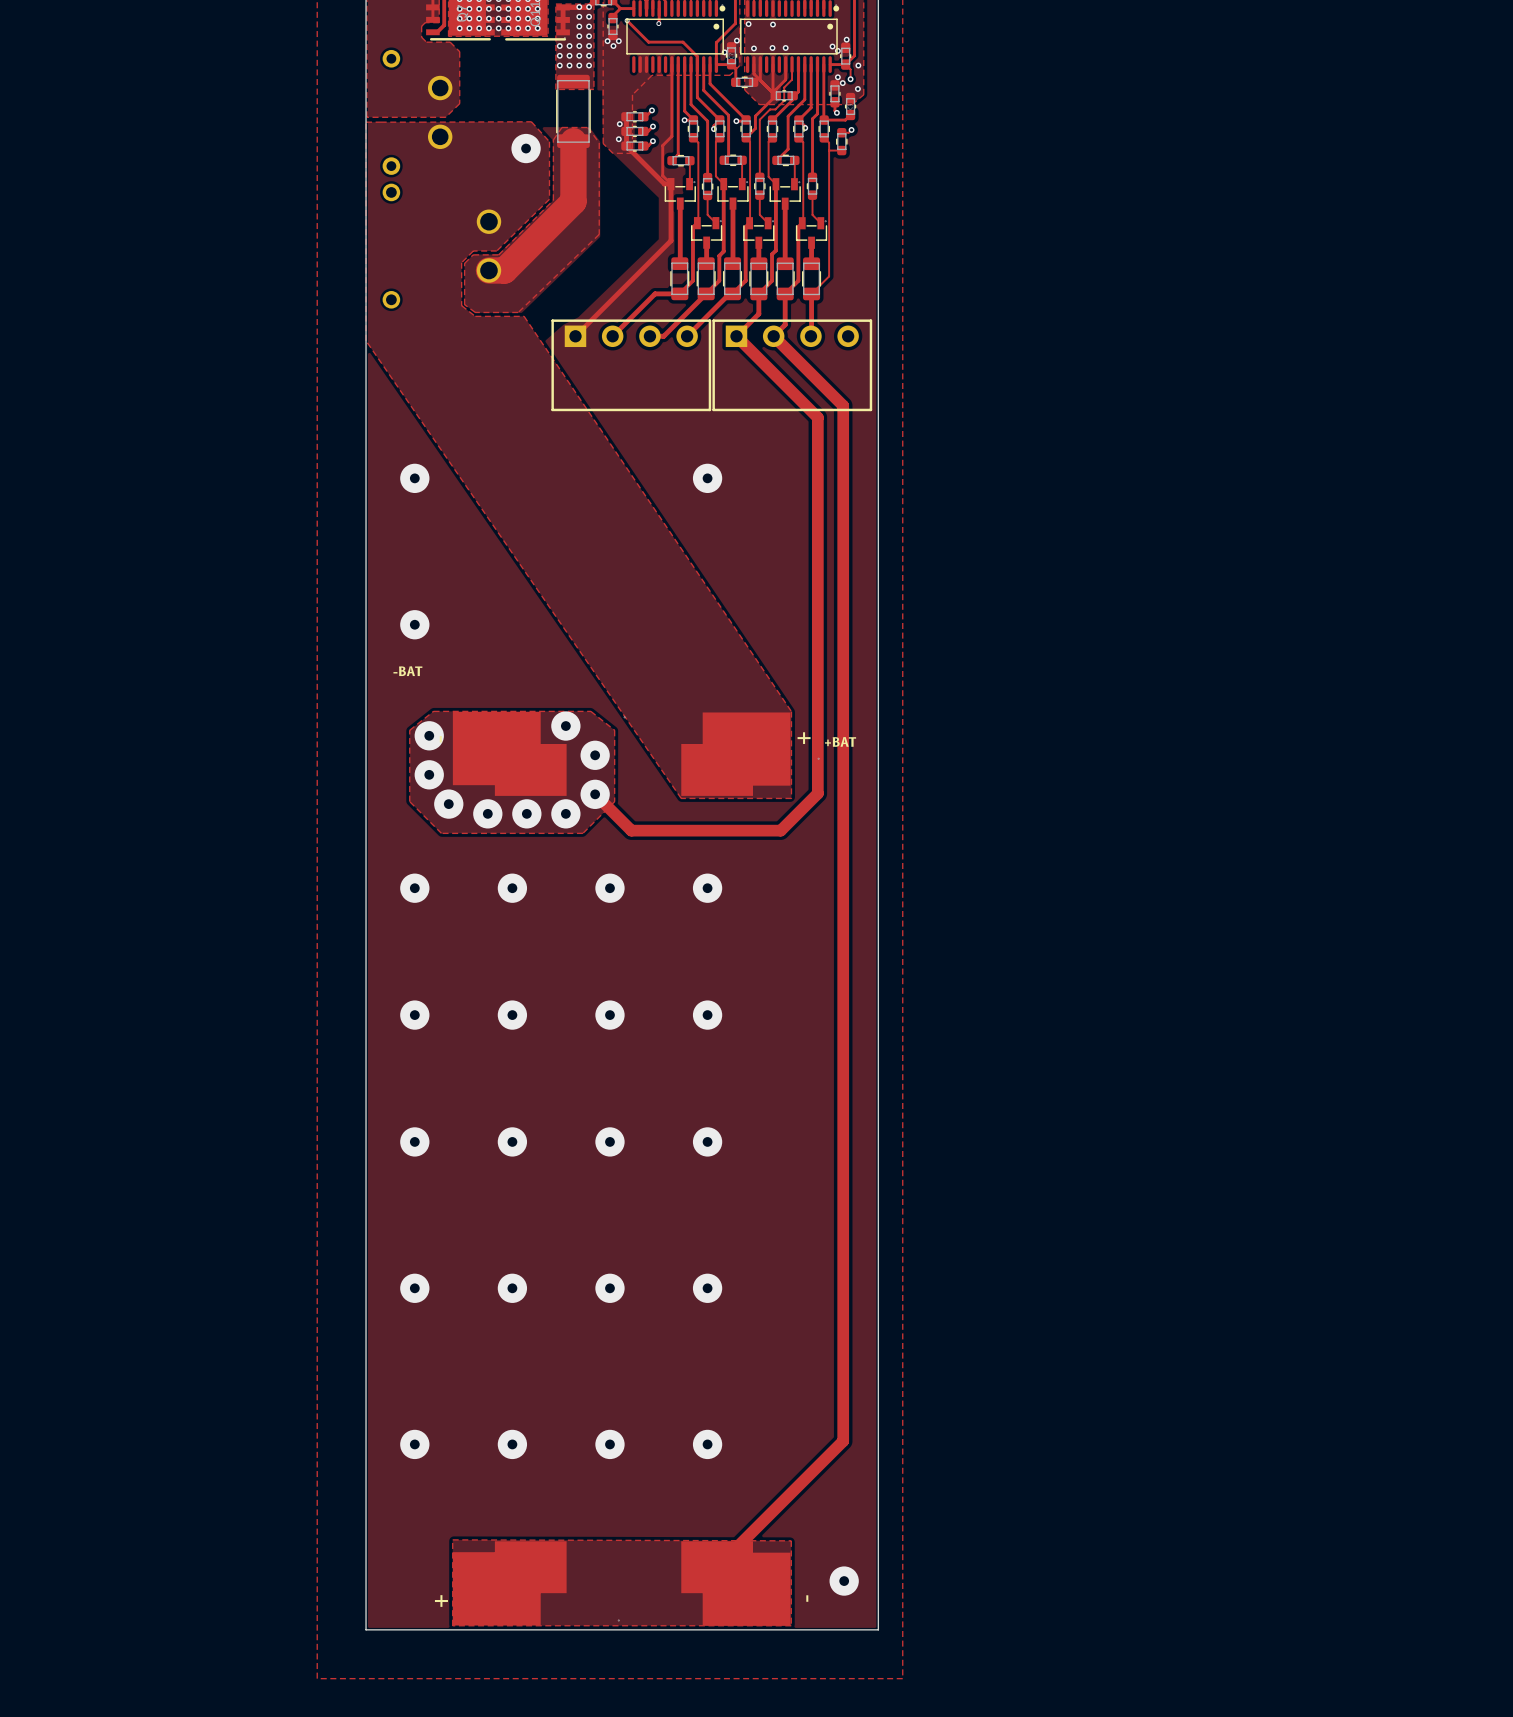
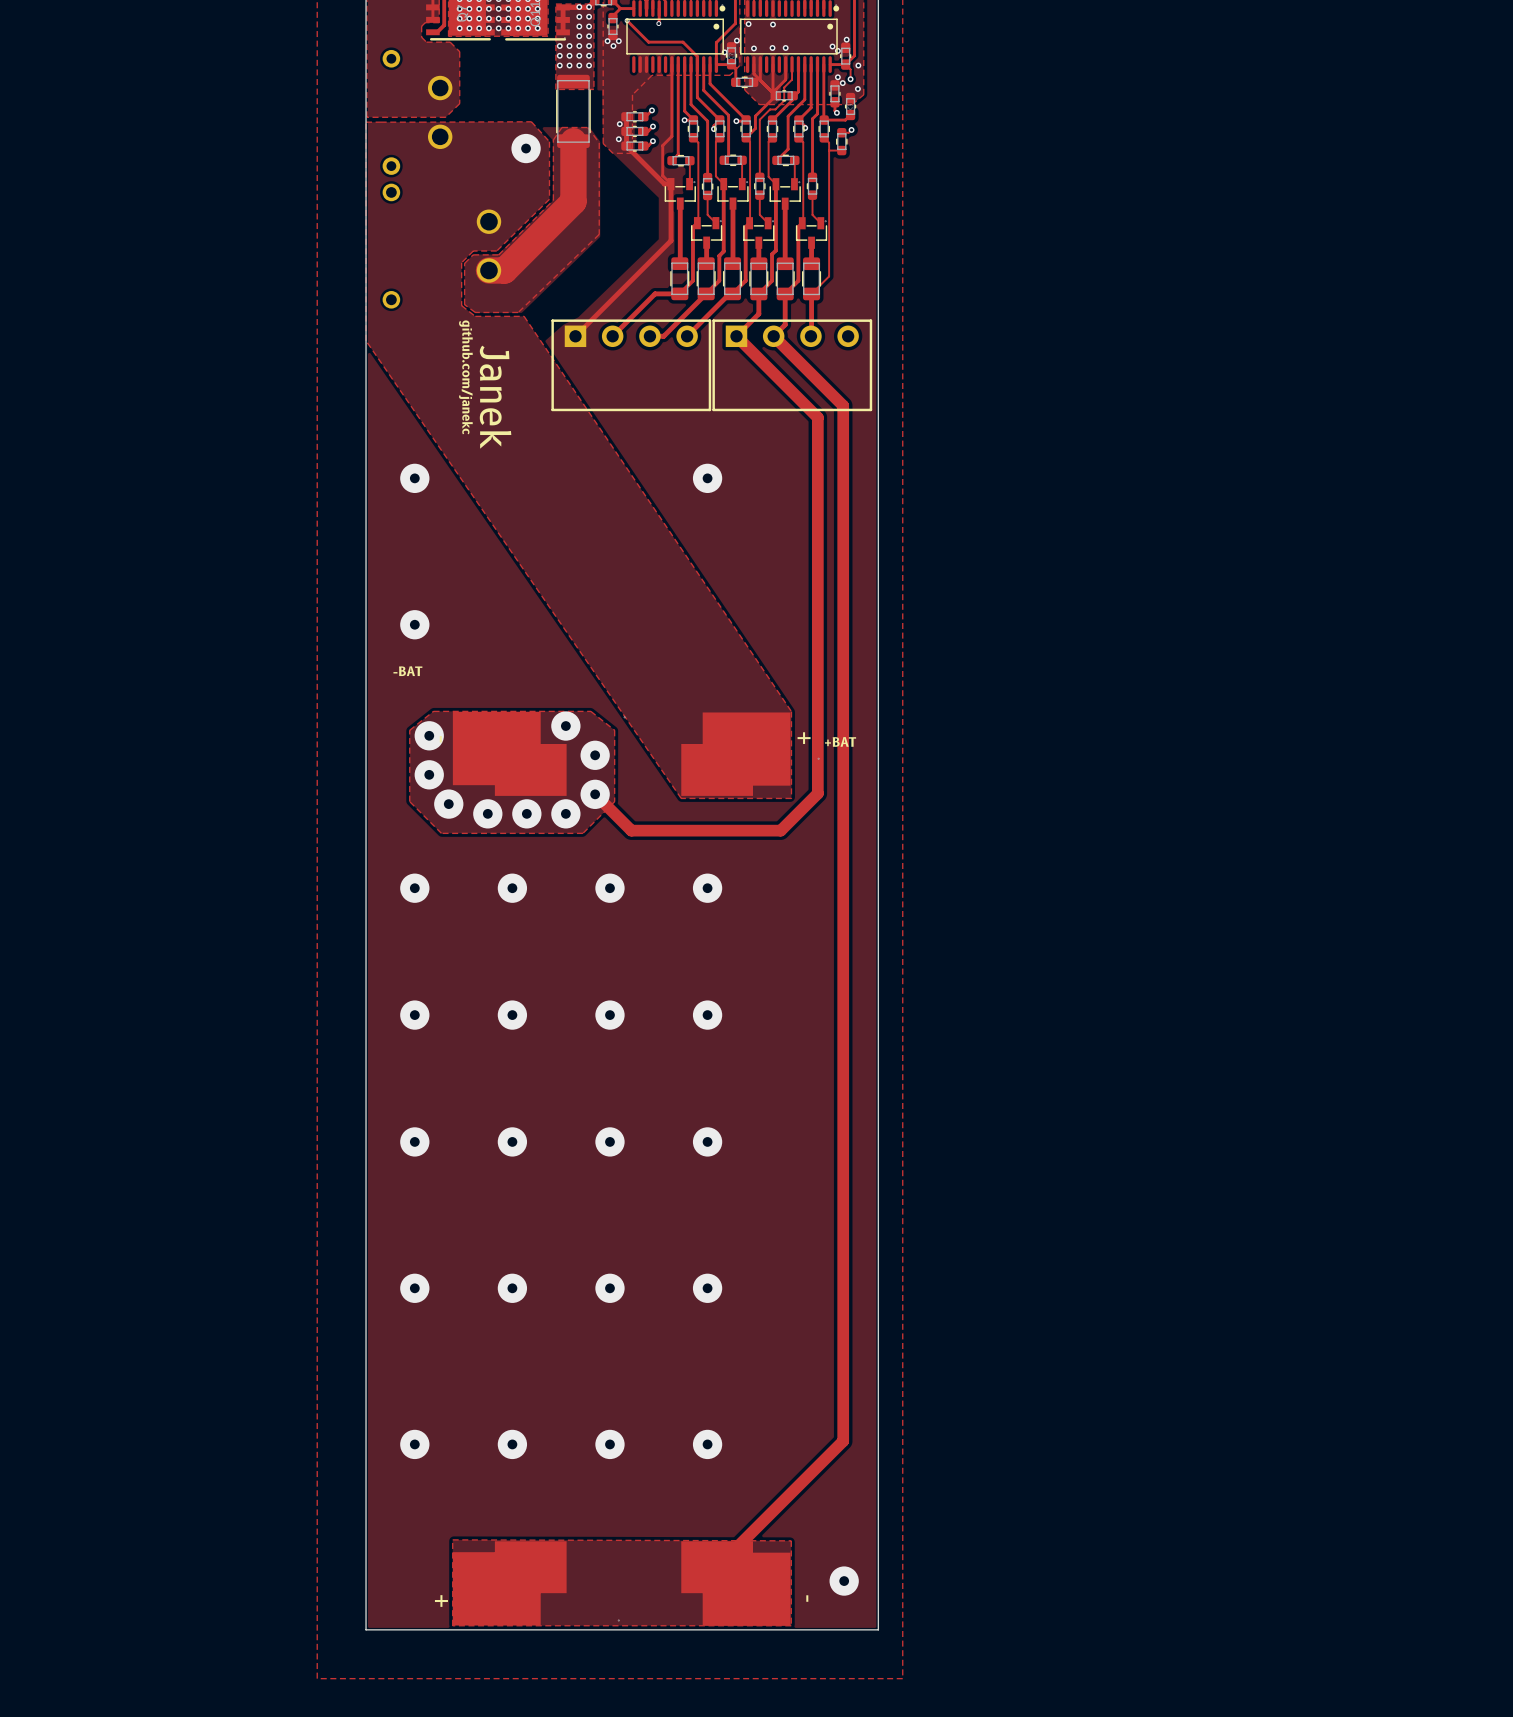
text: none -> github.com/janekc (465, 377)
text: none -> Janek (495, 397)

